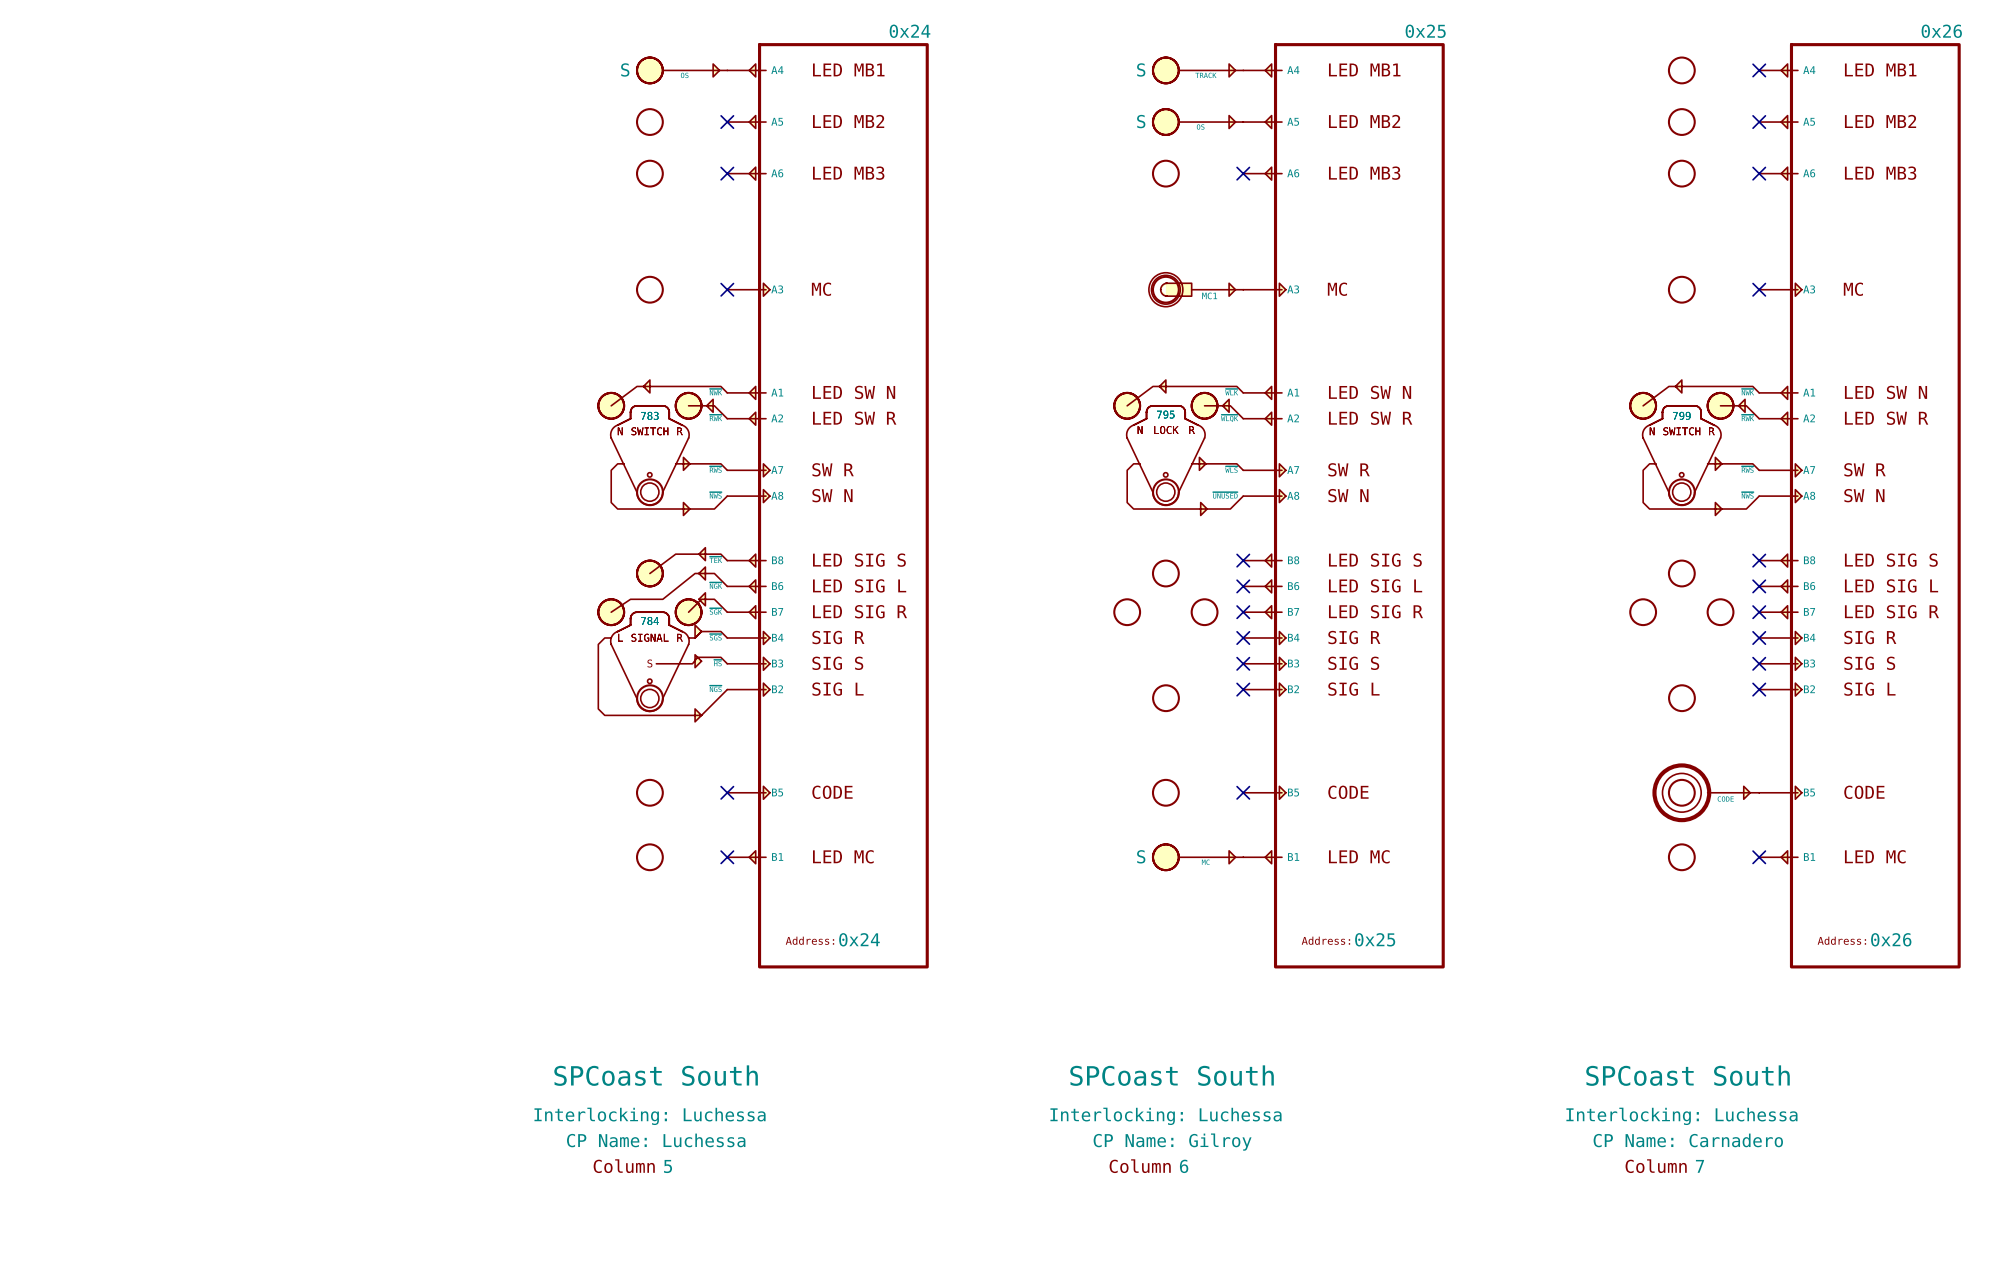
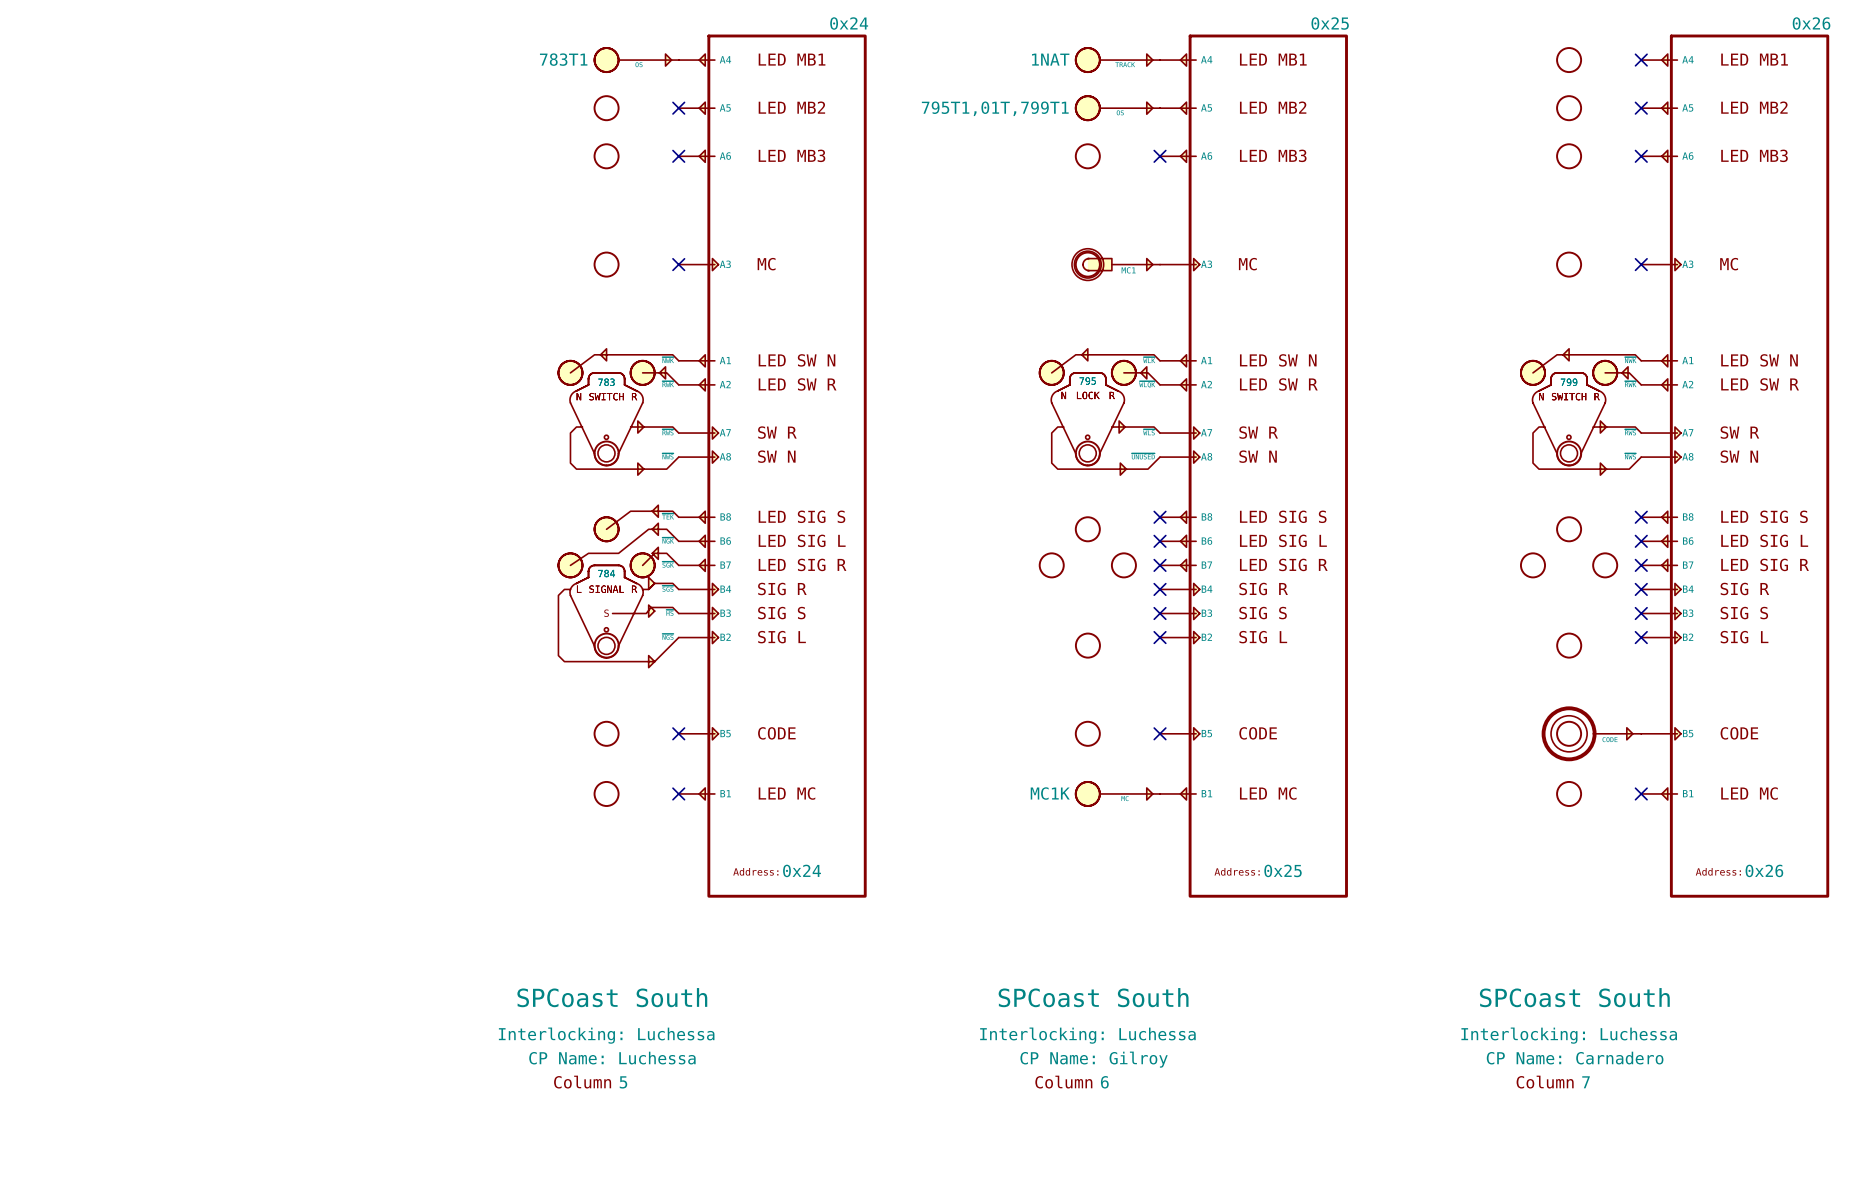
part text: S (625, 69) -> 783T1 (563, 59)
part text: S (1141, 69) -> 1NAT (1050, 59)
part text: S (1141, 121) -> 795T1,01T,799T1 (995, 108)
part text: S (1141, 856) -> MC1K (1050, 793)

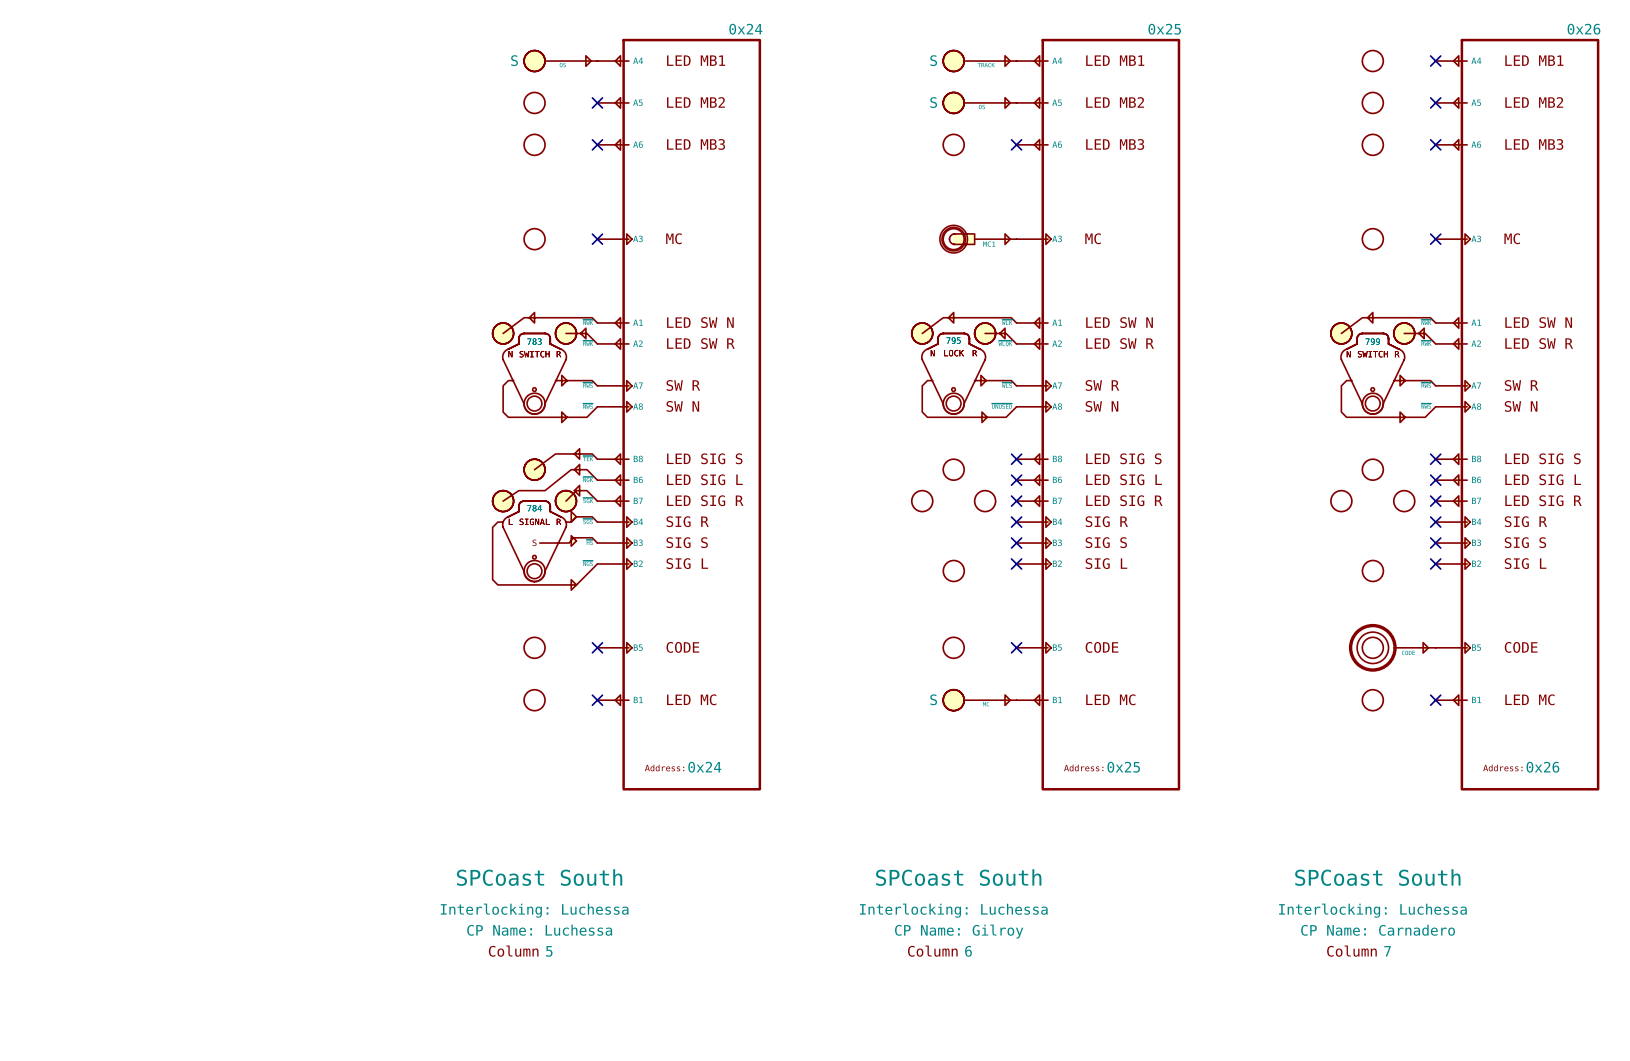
part text: 783T1 (563, 59) -> S (514, 60)
part text: 1NAT (1050, 59) -> S (933, 60)
part text: 795T1,01T,799T1 (995, 108) -> S (933, 102)
part text: MC1K (1050, 793) -> S (933, 699)

